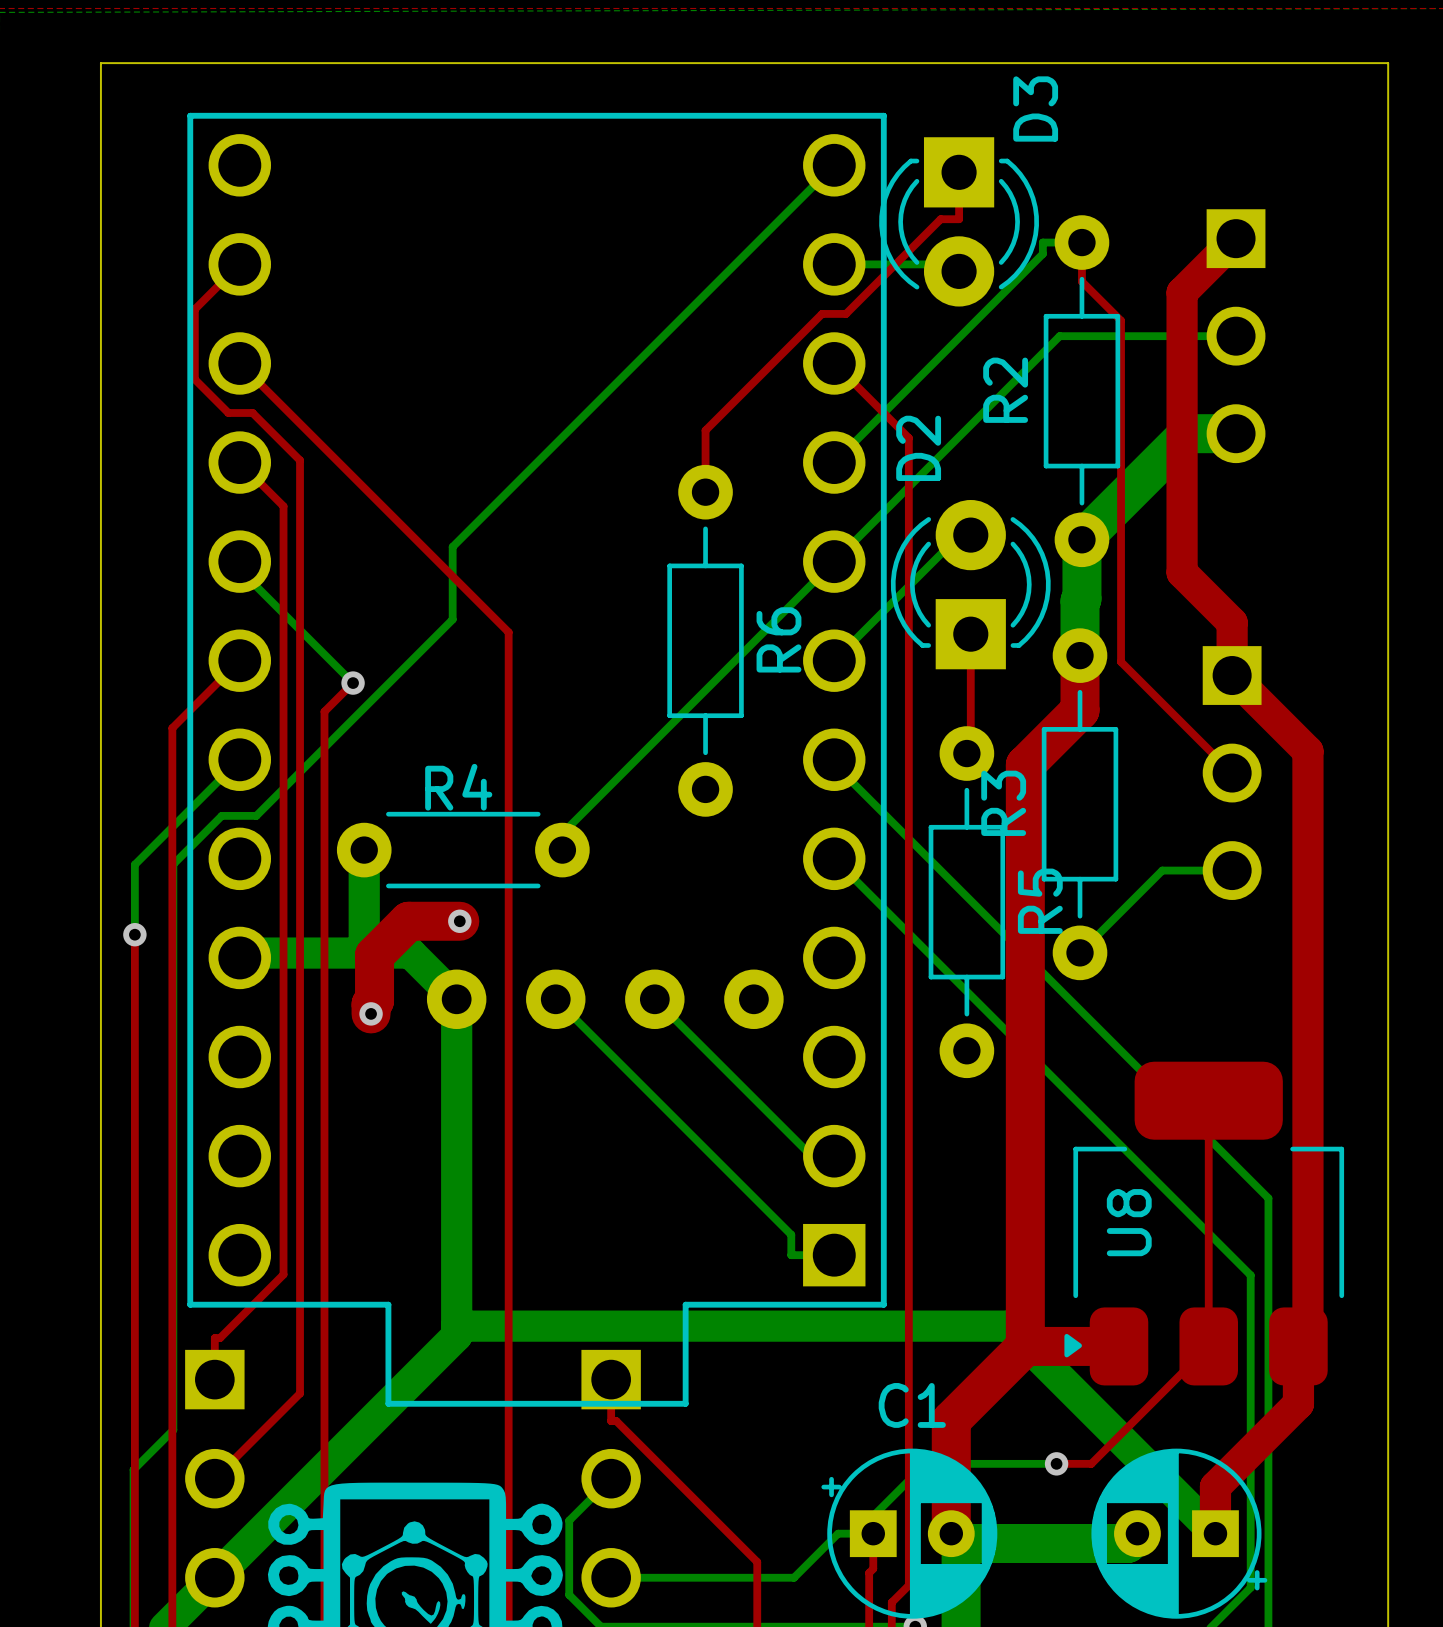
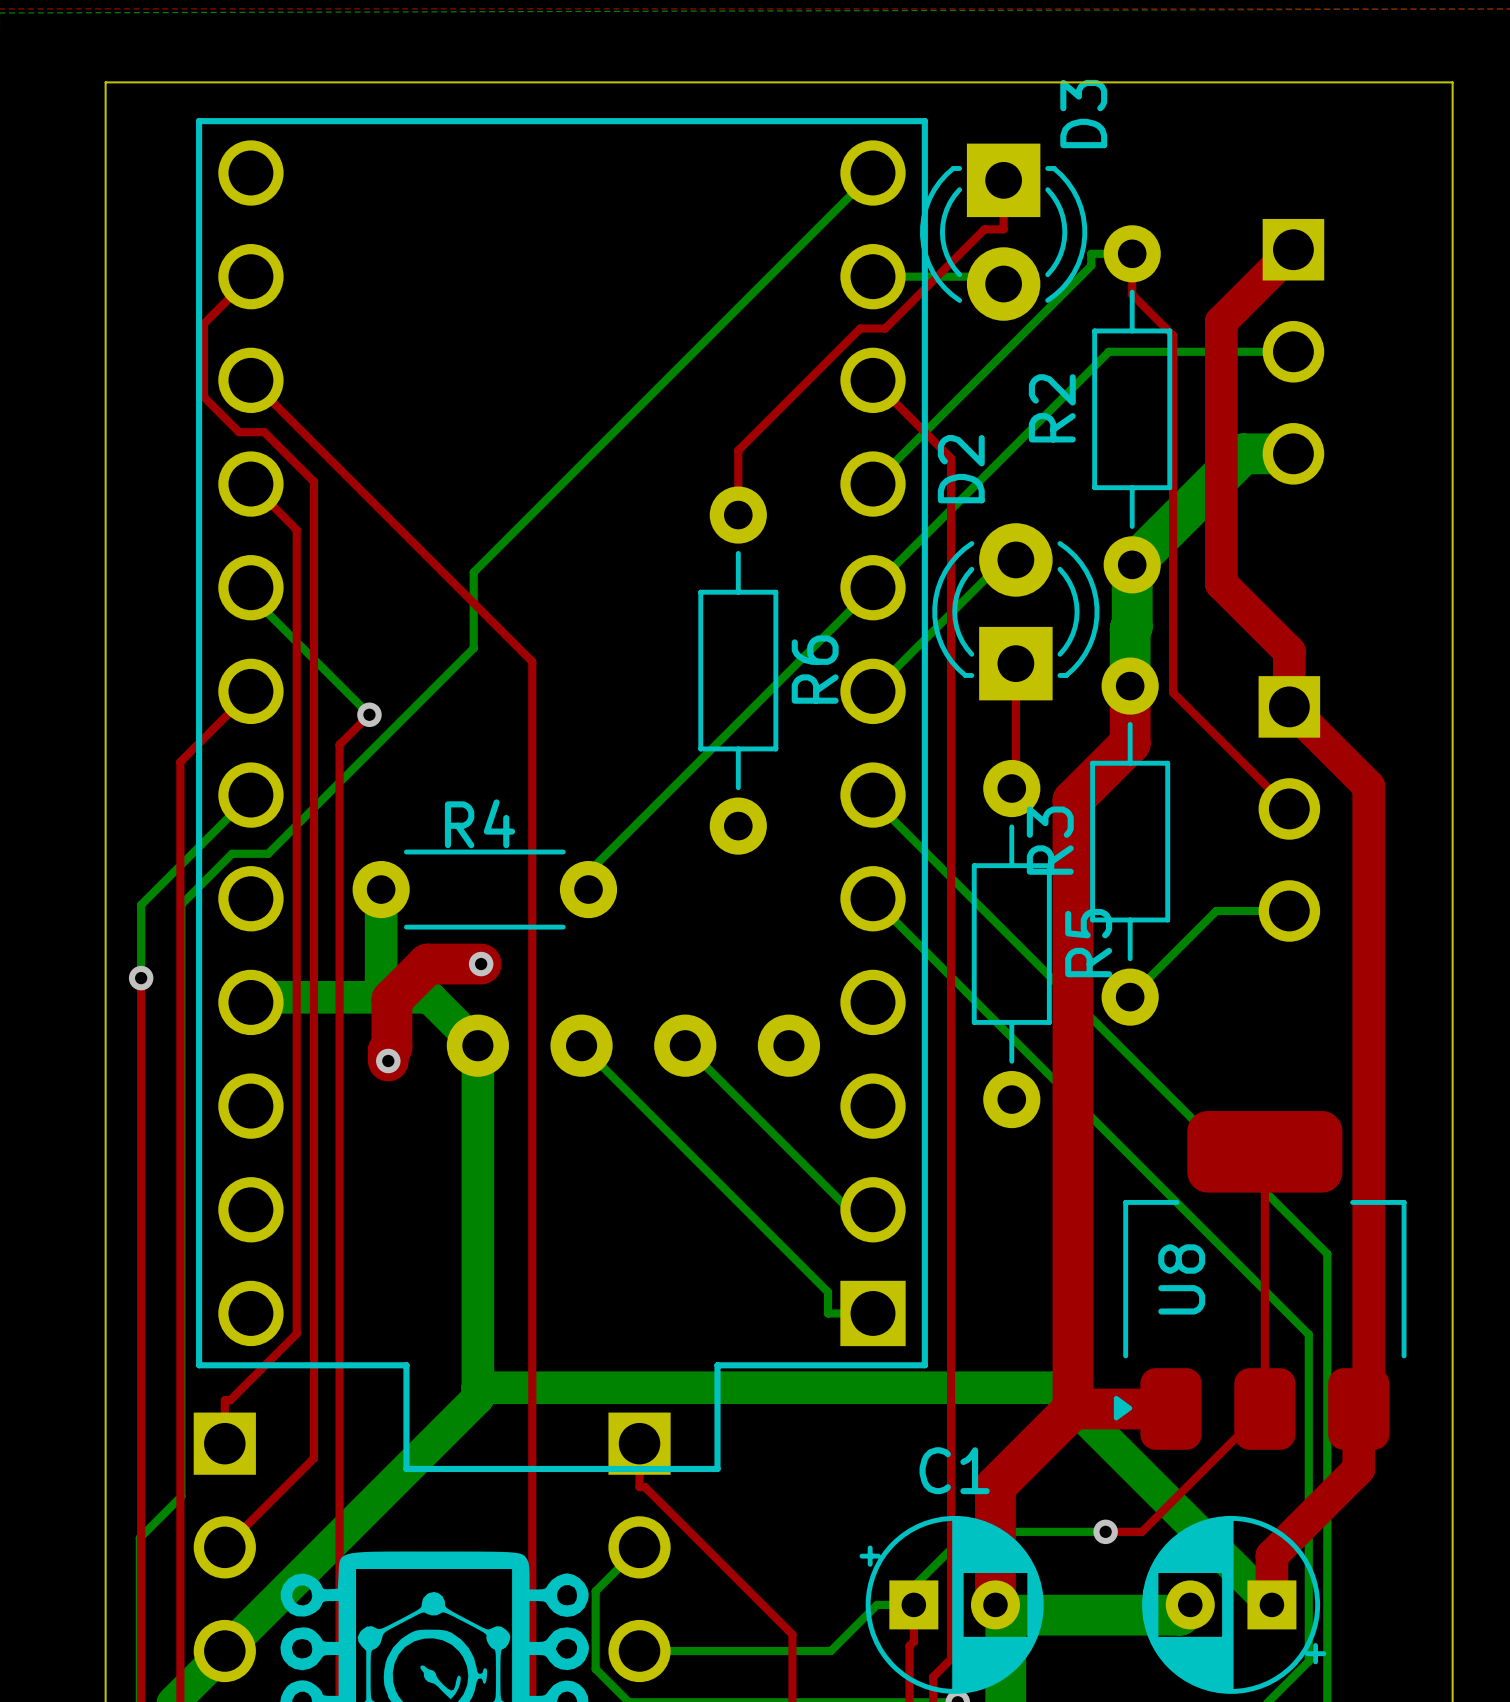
board edge: (100, 78) (100, 63) (1388, 63) (1388, 78) -> (105, 82) (1452, 82)
top track: (1182, 292) (1182, 572) -> (1236, 306) (1221, 321) (1221, 583) (1236, 599)

